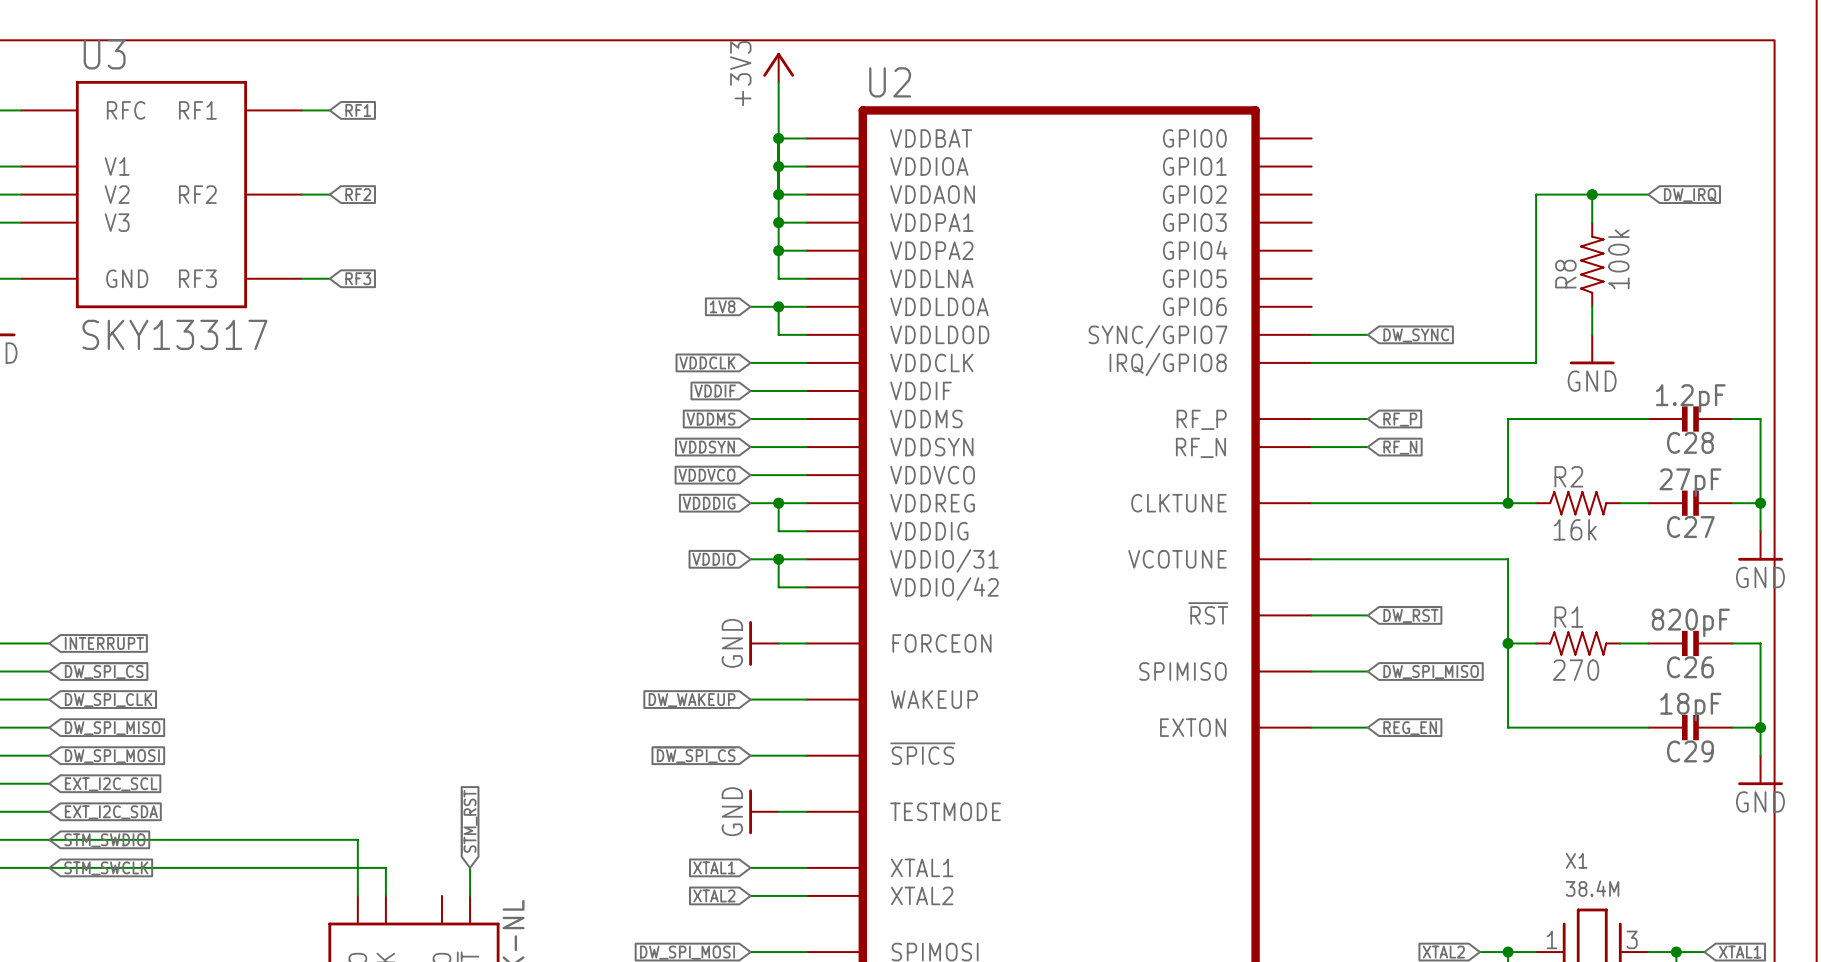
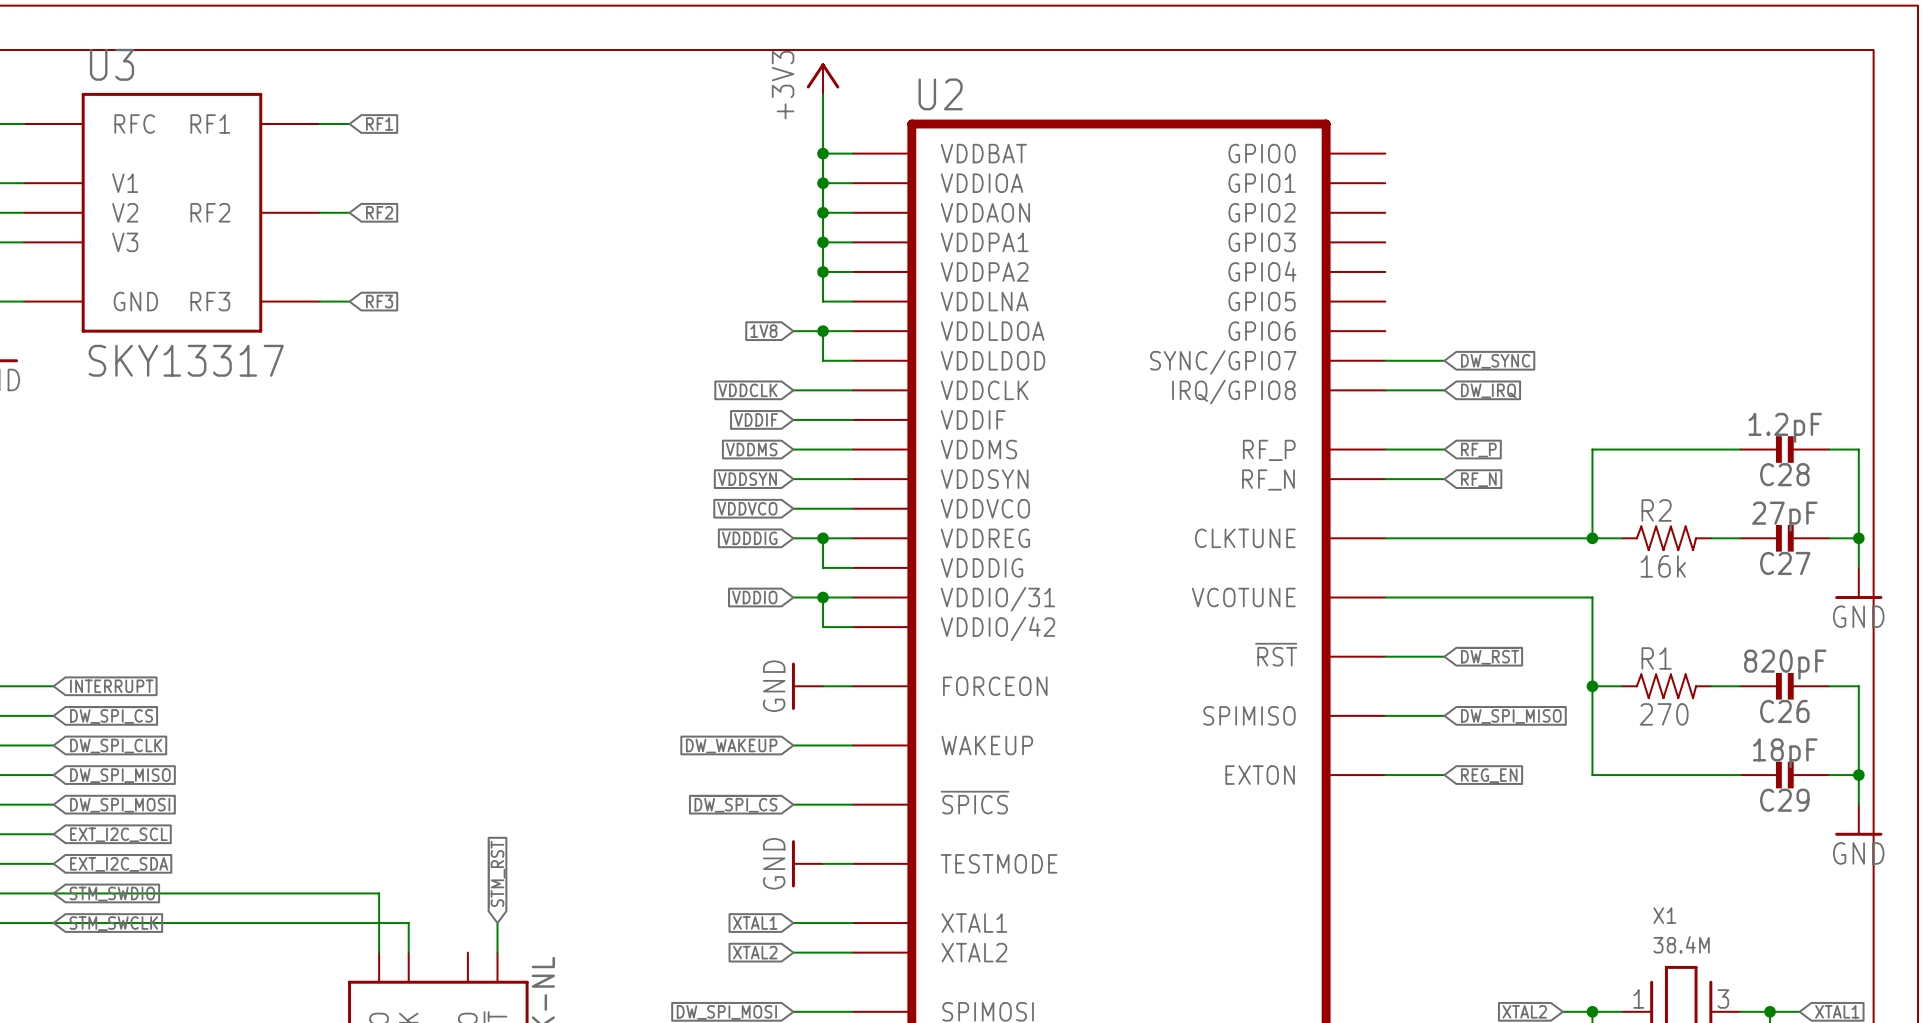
wire: (1592, 194) (1592, 222) -> none
junction: (1592, 194) -> none
wire: (1648, 194) (1536, 194) (1536, 362) (1367, 362) -> none
global label: DW_IRQ (1690, 195) -> none
R8: 100k (1592, 264) -> none
wire: (1592, 306) (1592, 334) -> none
power symbol: GND (1592, 349) -> none
global label: none -> DW_IRQ (1488, 390)

